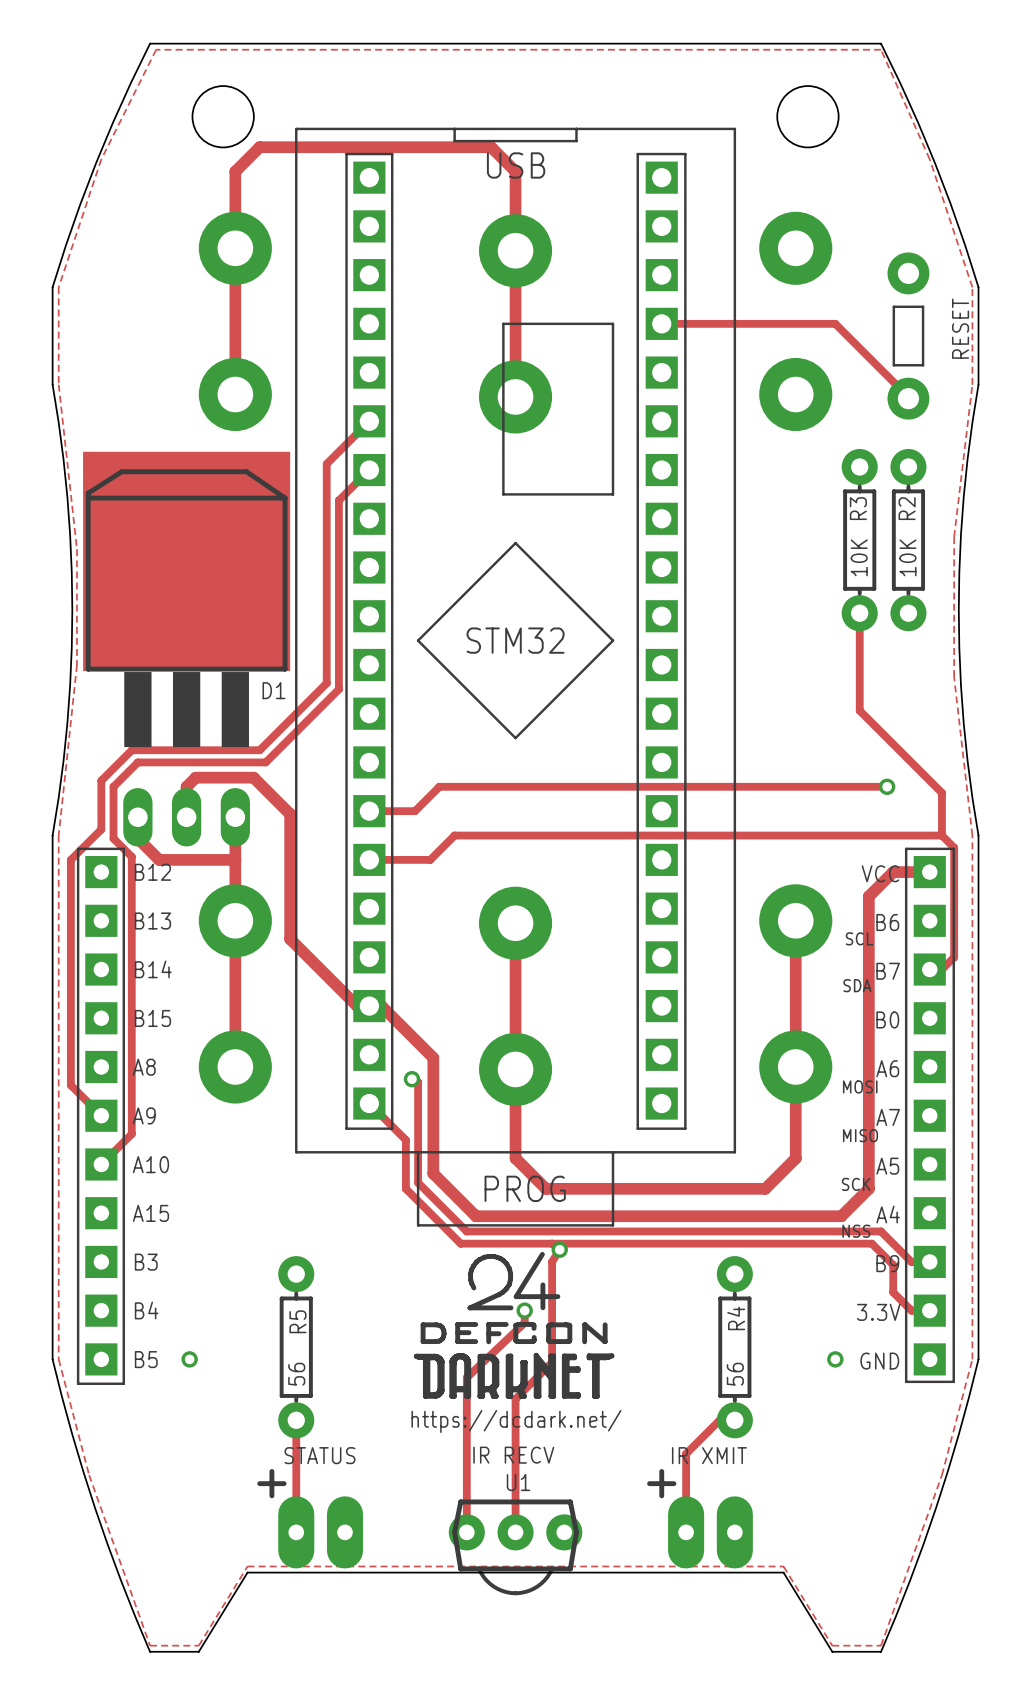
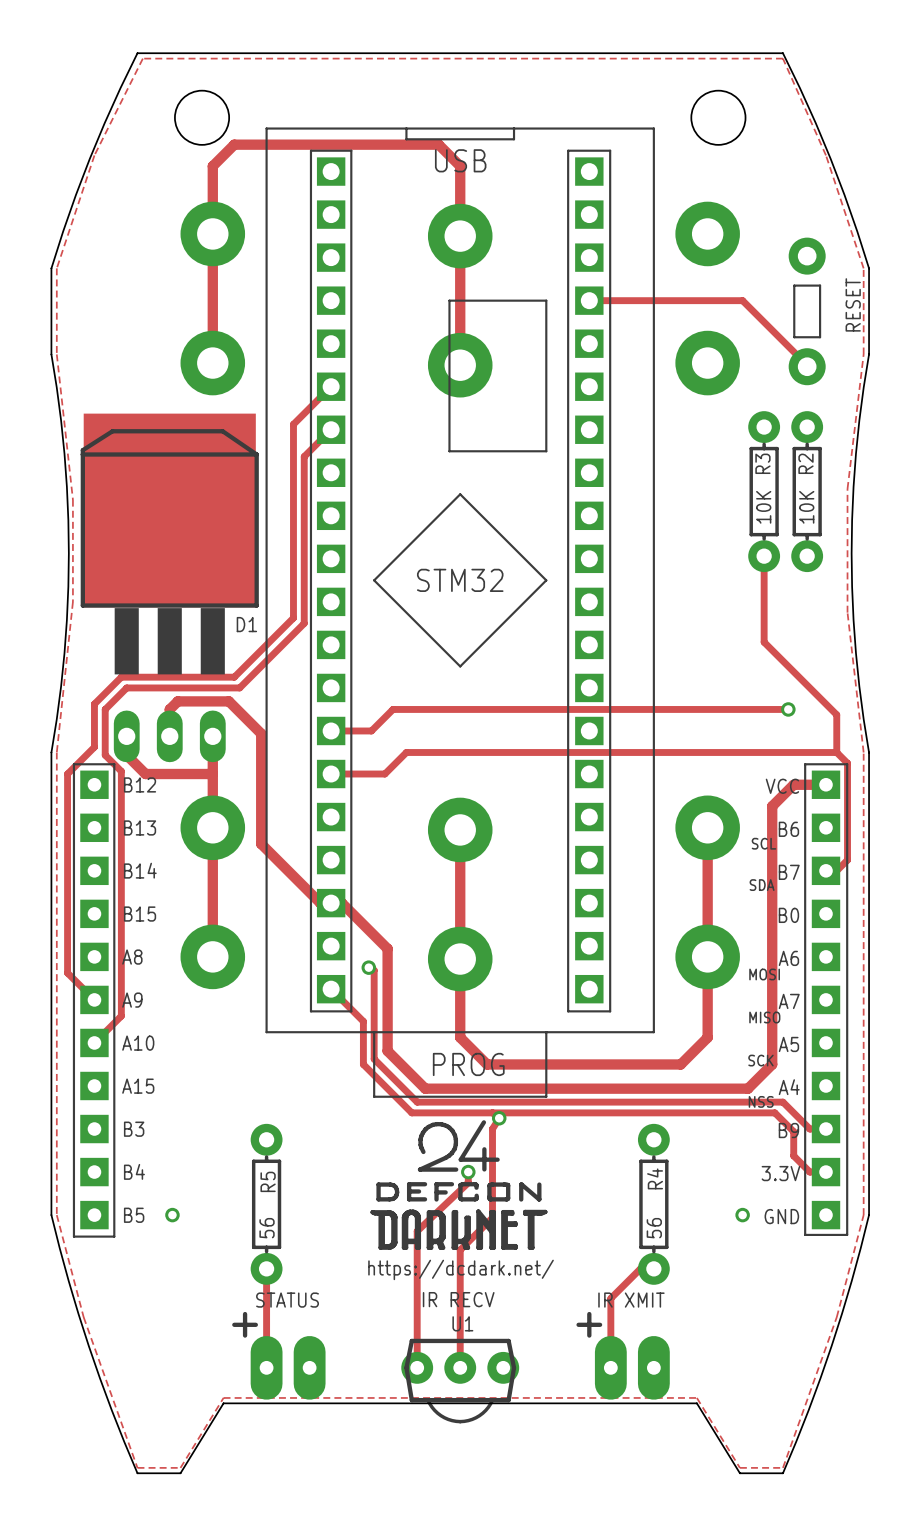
D1 footprint: [83, 451, 291, 847] -> [80, 413, 259, 763]

